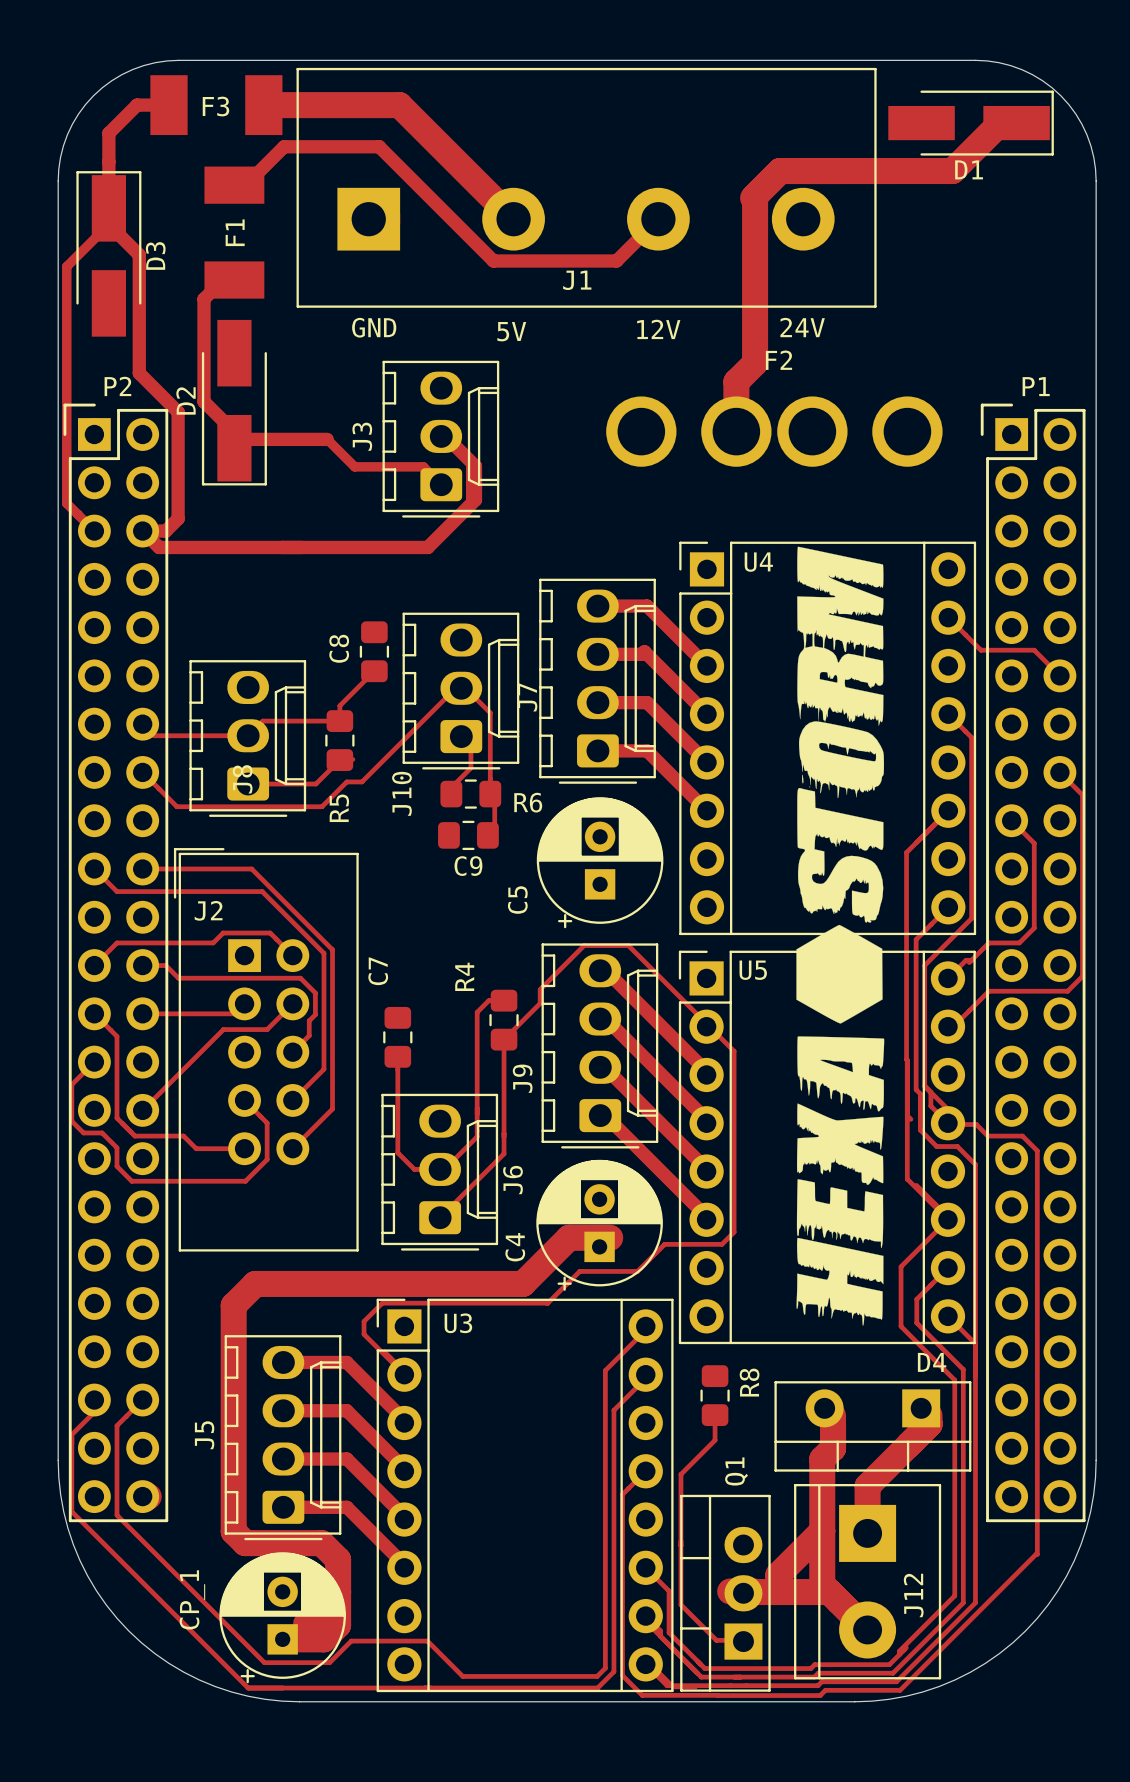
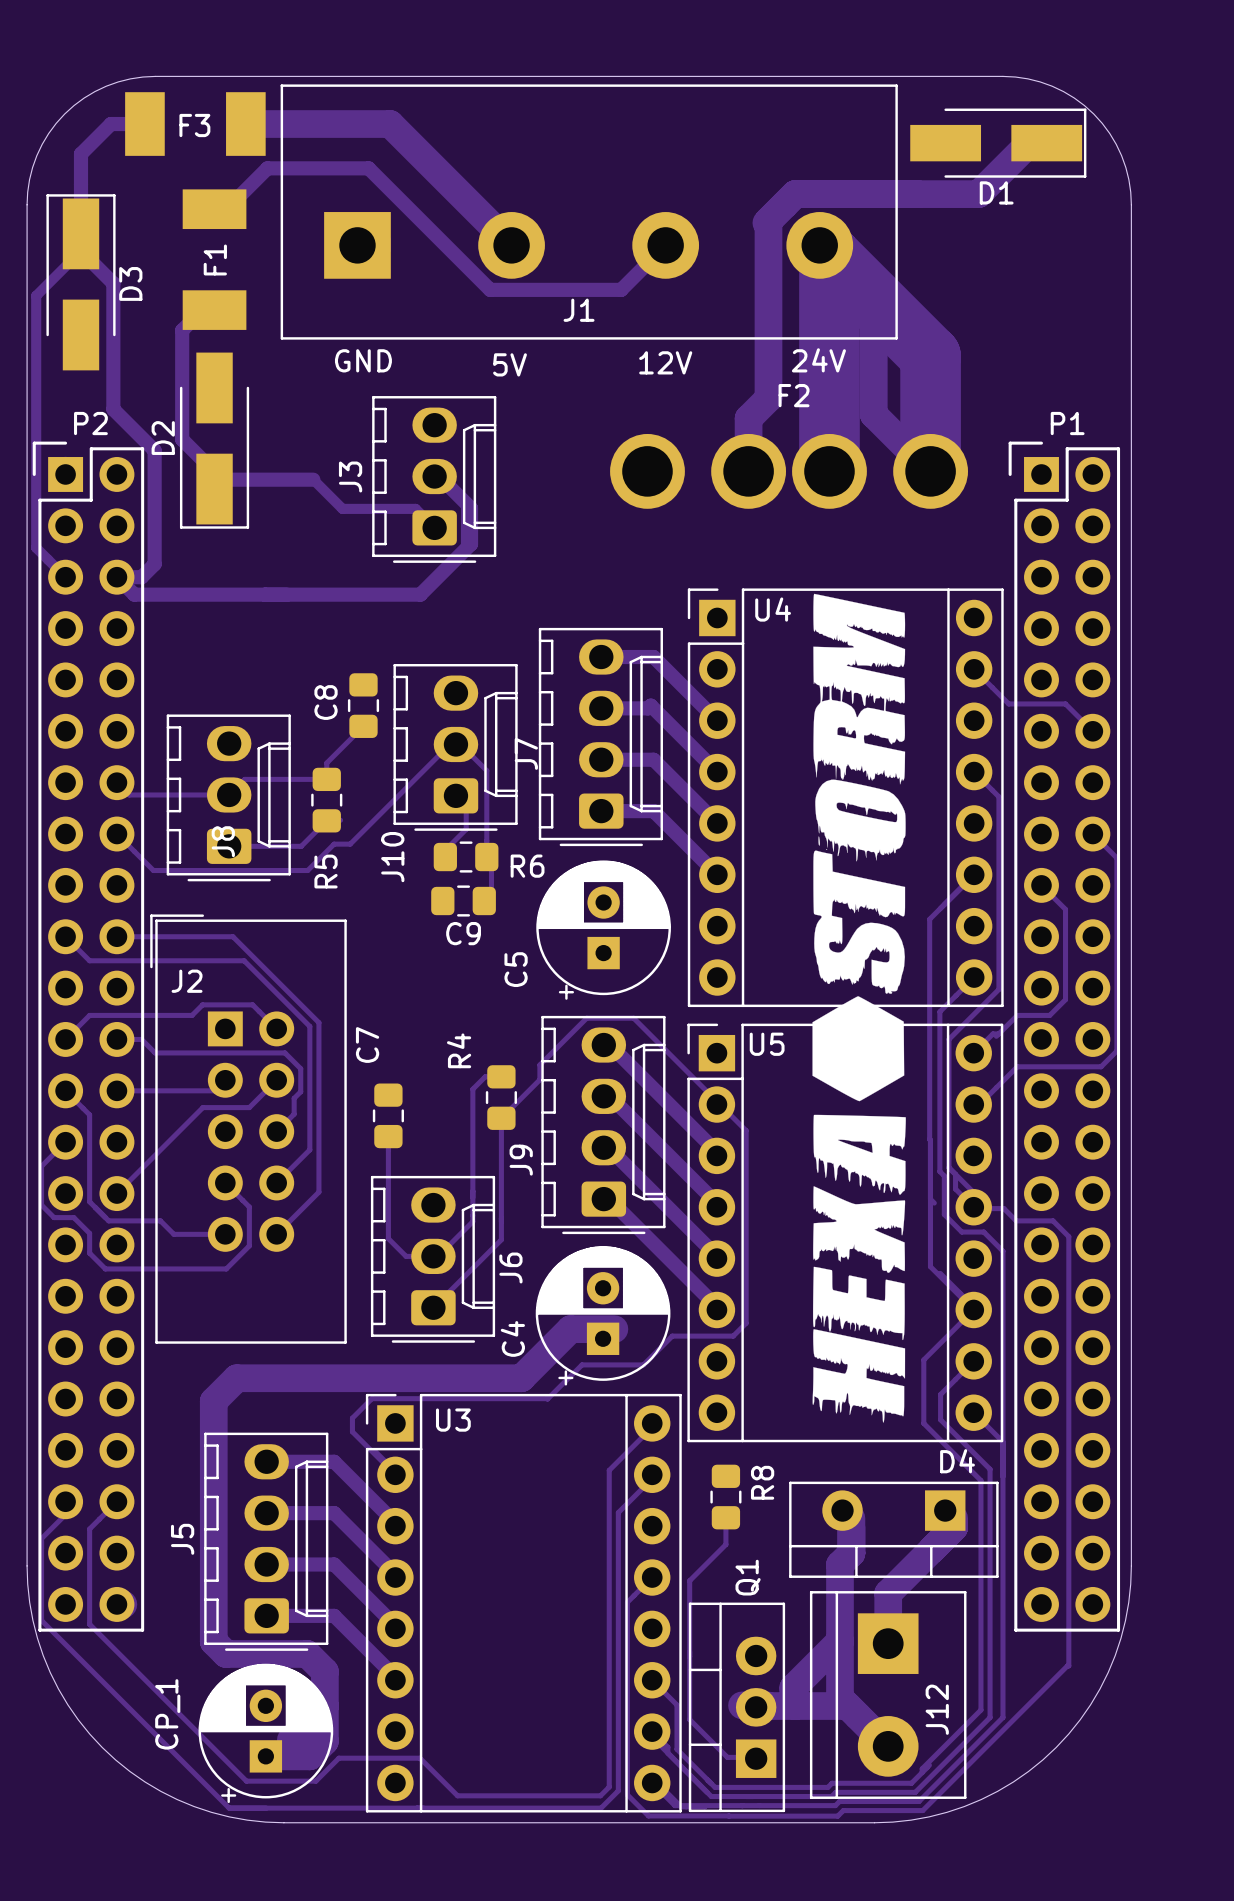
track: none -> (819, 245) (853, 278) (873, 278) (873, 414) (930, 471) (930, 356) (819, 245)
track: none -> (829, 255) (829, 471) (819, 461)

